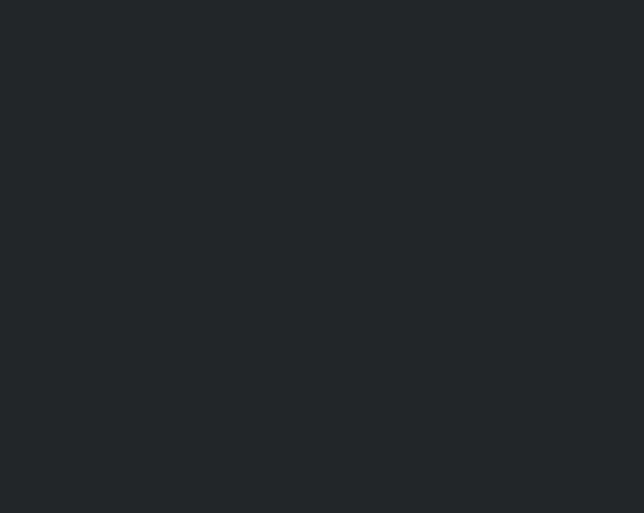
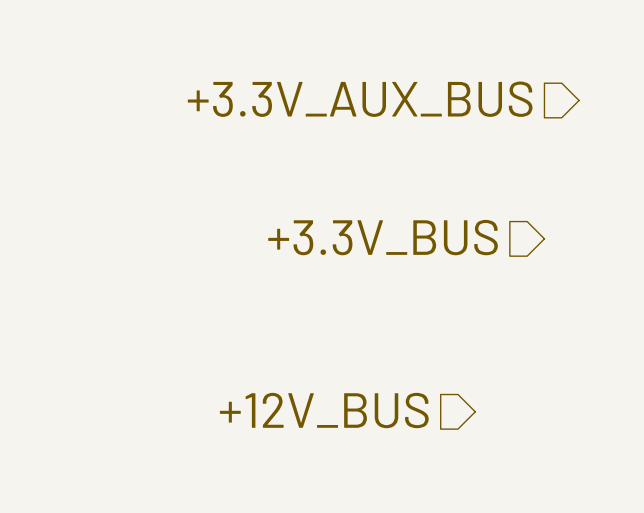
hierarchical label: none -> +3.3V_AUX_BUS (360, 99)
hierarchical label: none -> +3.3V_BUS (383, 237)
hierarchical label: none -> +12V_BUS (324, 410)

